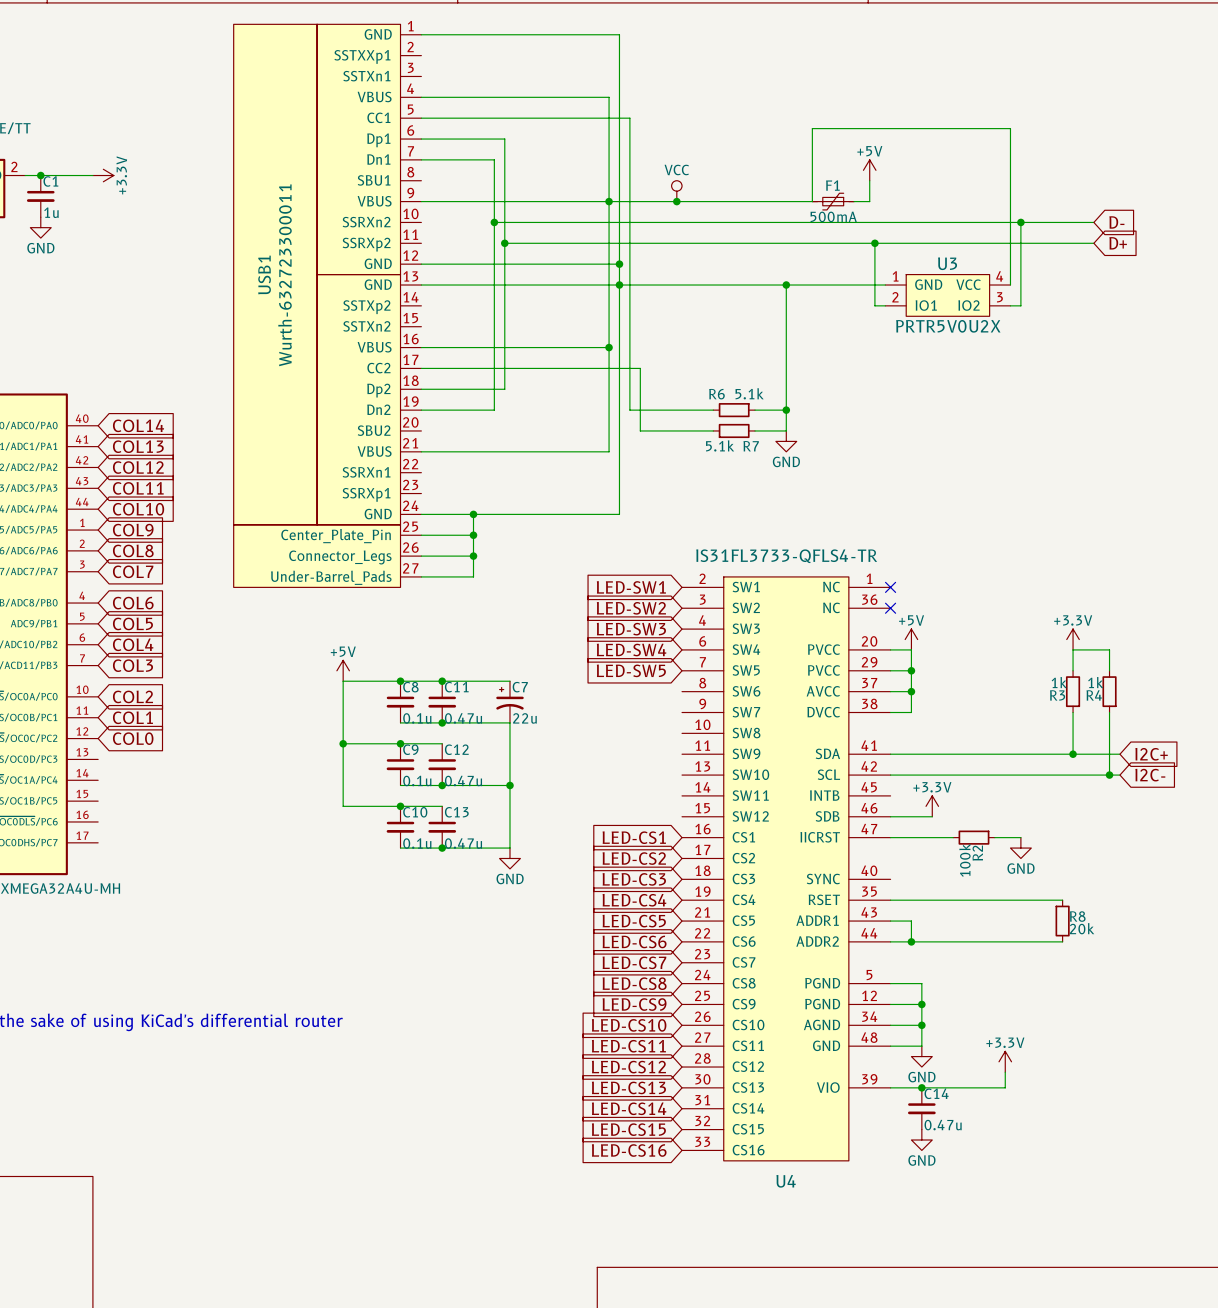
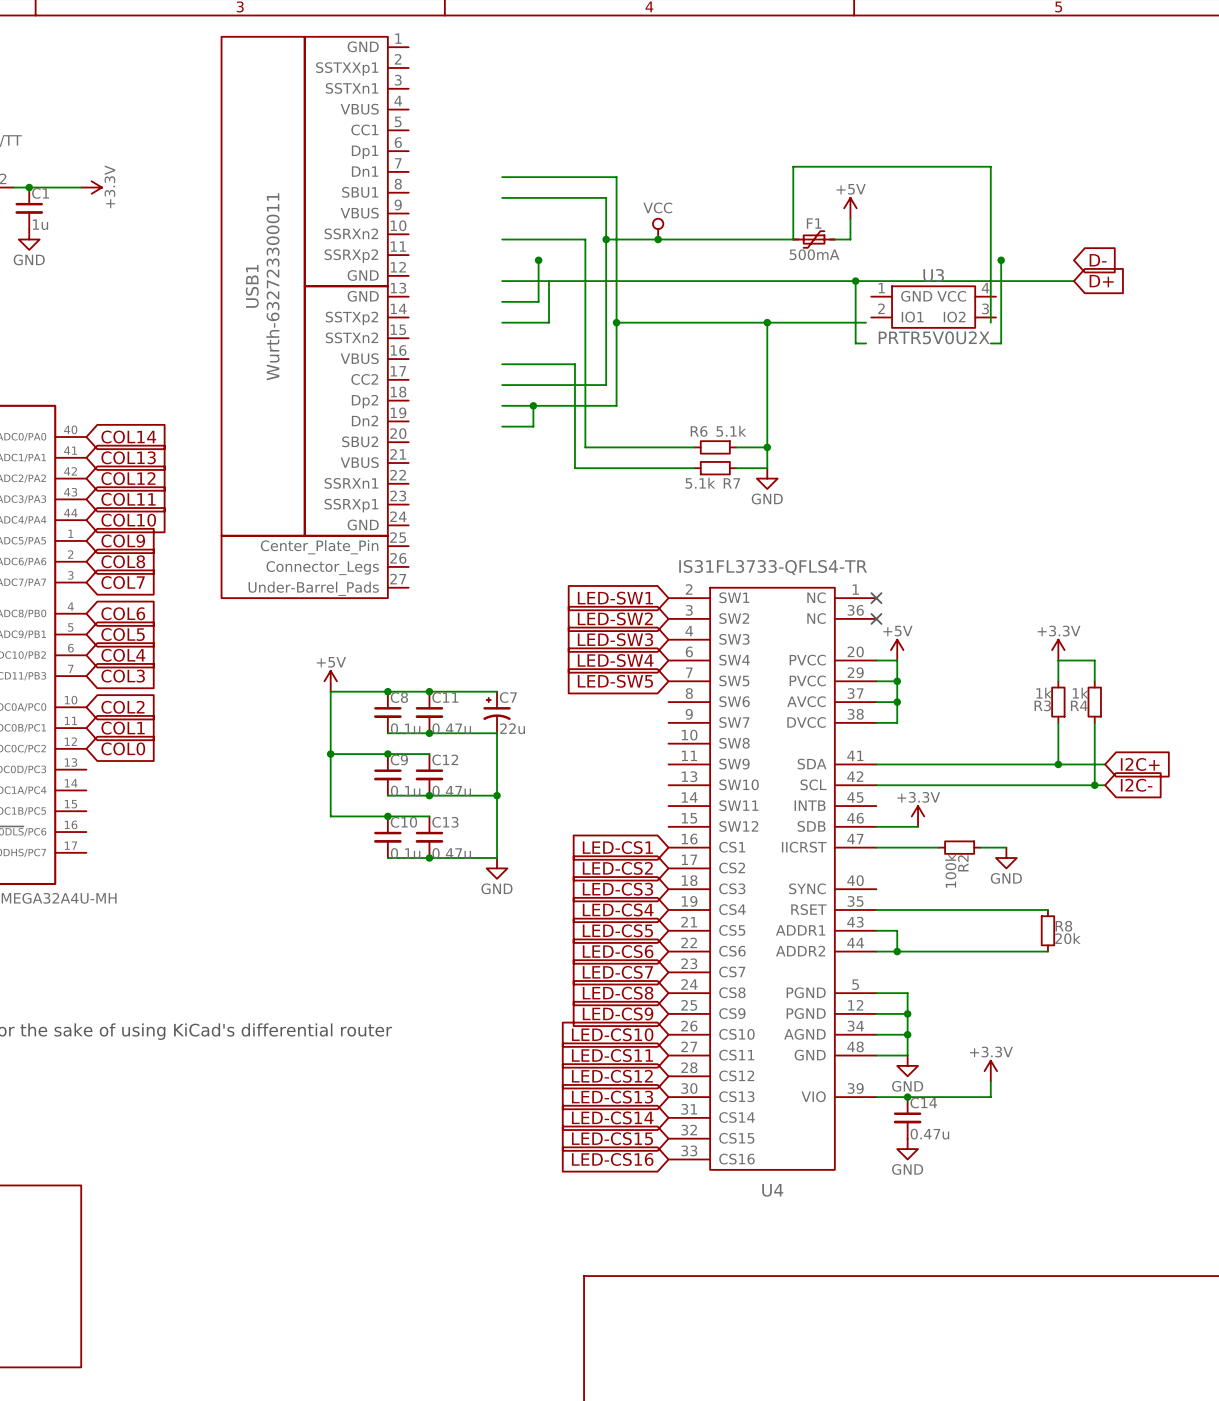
wire: (421, 34) (619, 34) (619, 185) -> (502, 197) (606, 197)
wire: (421, 97) (609, 97) (609, 451) (421, 451) -> none
wire: (421, 118) (629, 118) (629, 165) -> (502, 177) (616, 177)
wire: (421, 139) (504, 139) (504, 389) (421, 389) -> none
wire: (421, 159) (494, 159) (494, 410) (421, 410) -> none
power symbol position: +5V (869, 170) -> +5V (850, 208)
wire: (869, 180) (869, 201) (854, 201) -> (850, 218) (850, 239) (834, 239)
power symbol position: VCC (676, 191) -> VCC (658, 229)
wire: (421, 201) (812, 201) (812, 128) (1010, 128) (1010, 285) -> none
junction: (609, 201) -> none
junction position: (676, 201) -> (658, 239)
F1 position: (833, 201) -> (814, 239)
wire: (494, 222) (1093, 222) -> none
junction: (494, 222) -> none
wire: (1020, 222) (1020, 305) (1010, 305) -> (1001, 260) (1001, 343) (990, 343)
junction position: (1020, 222) -> (1001, 260)
global label position: D- (1116, 222) -> D- (1098, 260)
wire: none -> (502, 239) (585, 239) (585, 447) (694, 447)
wire: none -> (606, 239) (793, 239) (793, 166) (990, 166) (990, 322)
junction: none -> (606, 239)
wire: (504, 243) (1093, 243) -> none
junction: (504, 243) -> none
wire: (874, 243) (874, 305) (885, 305) -> (855, 281) (855, 343) (866, 343)
junction position: (874, 243) -> (855, 281)
global label position: D+ (1118, 243) -> D+ (1101, 281)
wire: none -> (538, 260) (538, 301) (502, 301)
junction: none -> (538, 260)
wire: (421, 264) (619, 264) -> none
junction: (619, 264) -> none
wire: none -> (502, 281) (1073, 281)
wire: none -> (548, 281) (548, 322) (502, 322)
wire: (421, 285) (885, 285) -> none
junction: (619, 285) -> none
wire: (786, 285) (786, 430) (755, 430) -> (767, 322) (767, 468) (736, 468)
junction position: (786, 285) -> (767, 322)
wire: none -> (616, 322) (866, 322)
junction: none -> (616, 322)
wire: (421, 347) (609, 347) -> none
junction: (609, 347) -> none
wire: none -> (502, 364) (574, 364) (574, 468) (694, 468)
wire: (421, 368) (640, 368) (640, 430) (713, 430) -> none
wire: (619, 373) (619, 514) (421, 514) -> (606, 385) (502, 385)
wire: none -> (533, 405) (533, 426) (502, 426)
junction: none -> (533, 405)
wire: (629, 394) (629, 410) (713, 410) -> (616, 405) (502, 405)
R6 position: (734, 410) -> (715, 447)
wire: (755, 410) (786, 410) -> (736, 447) (767, 447)
junction position: (786, 410) -> (767, 447)
R7 position: (734, 430) -> (715, 468)
power symbol position: GND (786, 441) -> GND (767, 478)
wire: (473, 514) (473, 576) (421, 576) -> none
junction: (473, 514) -> none
wire: (421, 535) (473, 535) -> none
junction: (473, 535) -> none
wire: (421, 556) (473, 556) -> none
junction: (473, 556) -> none

